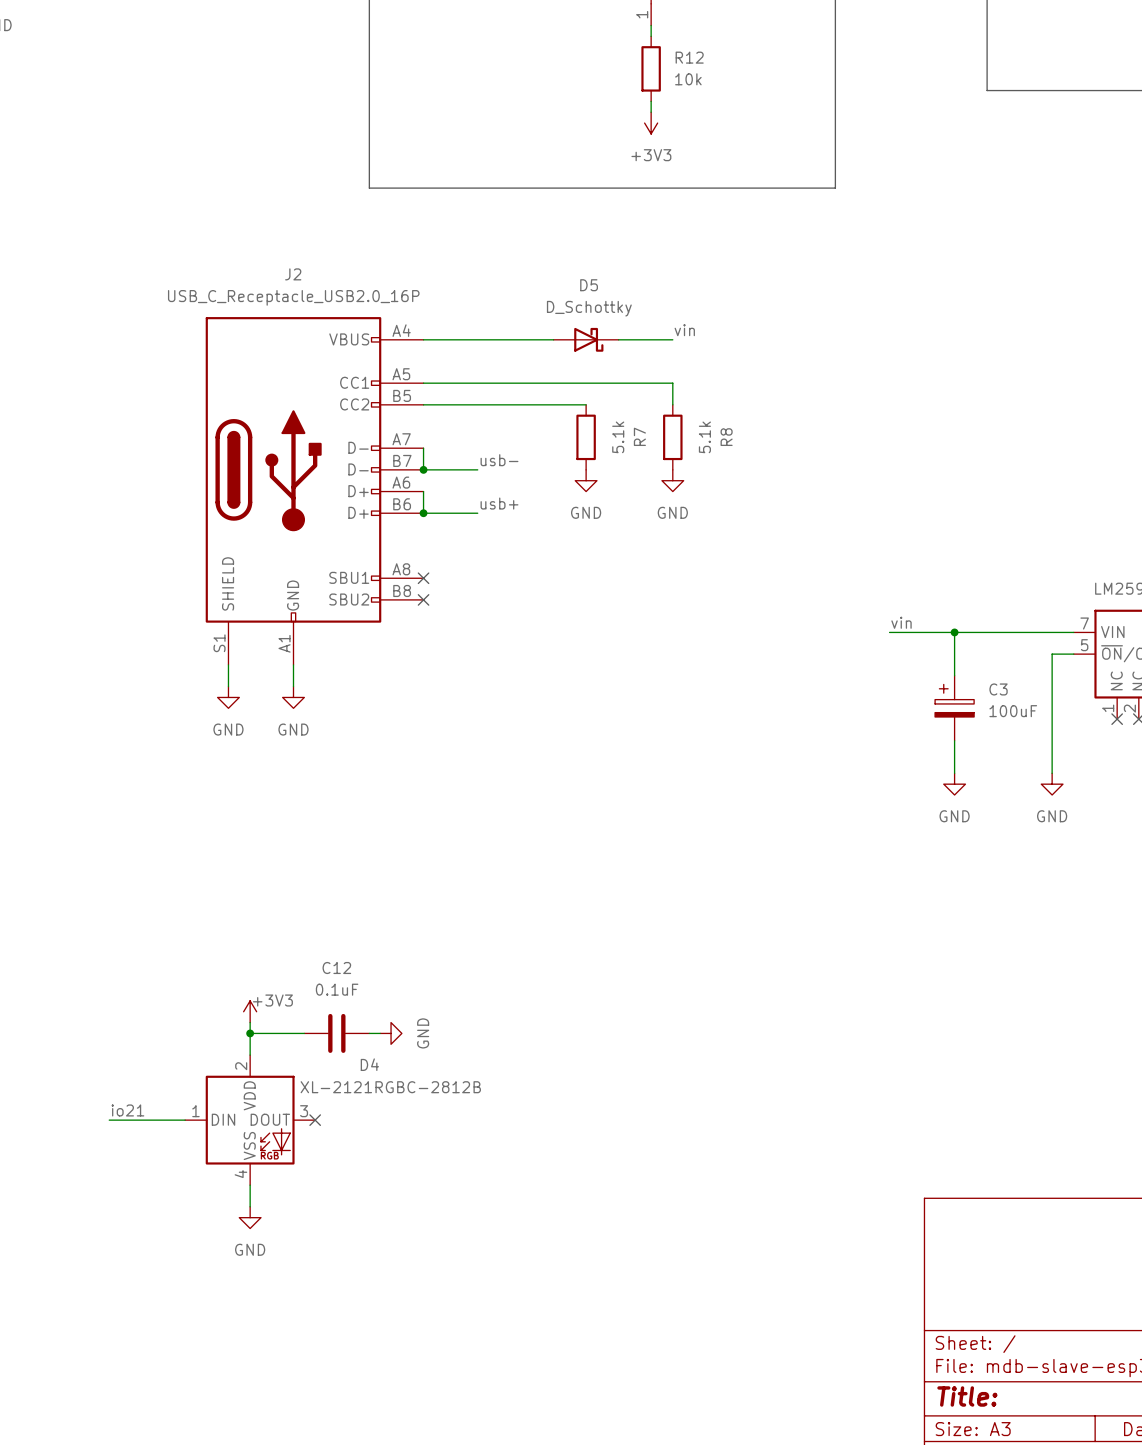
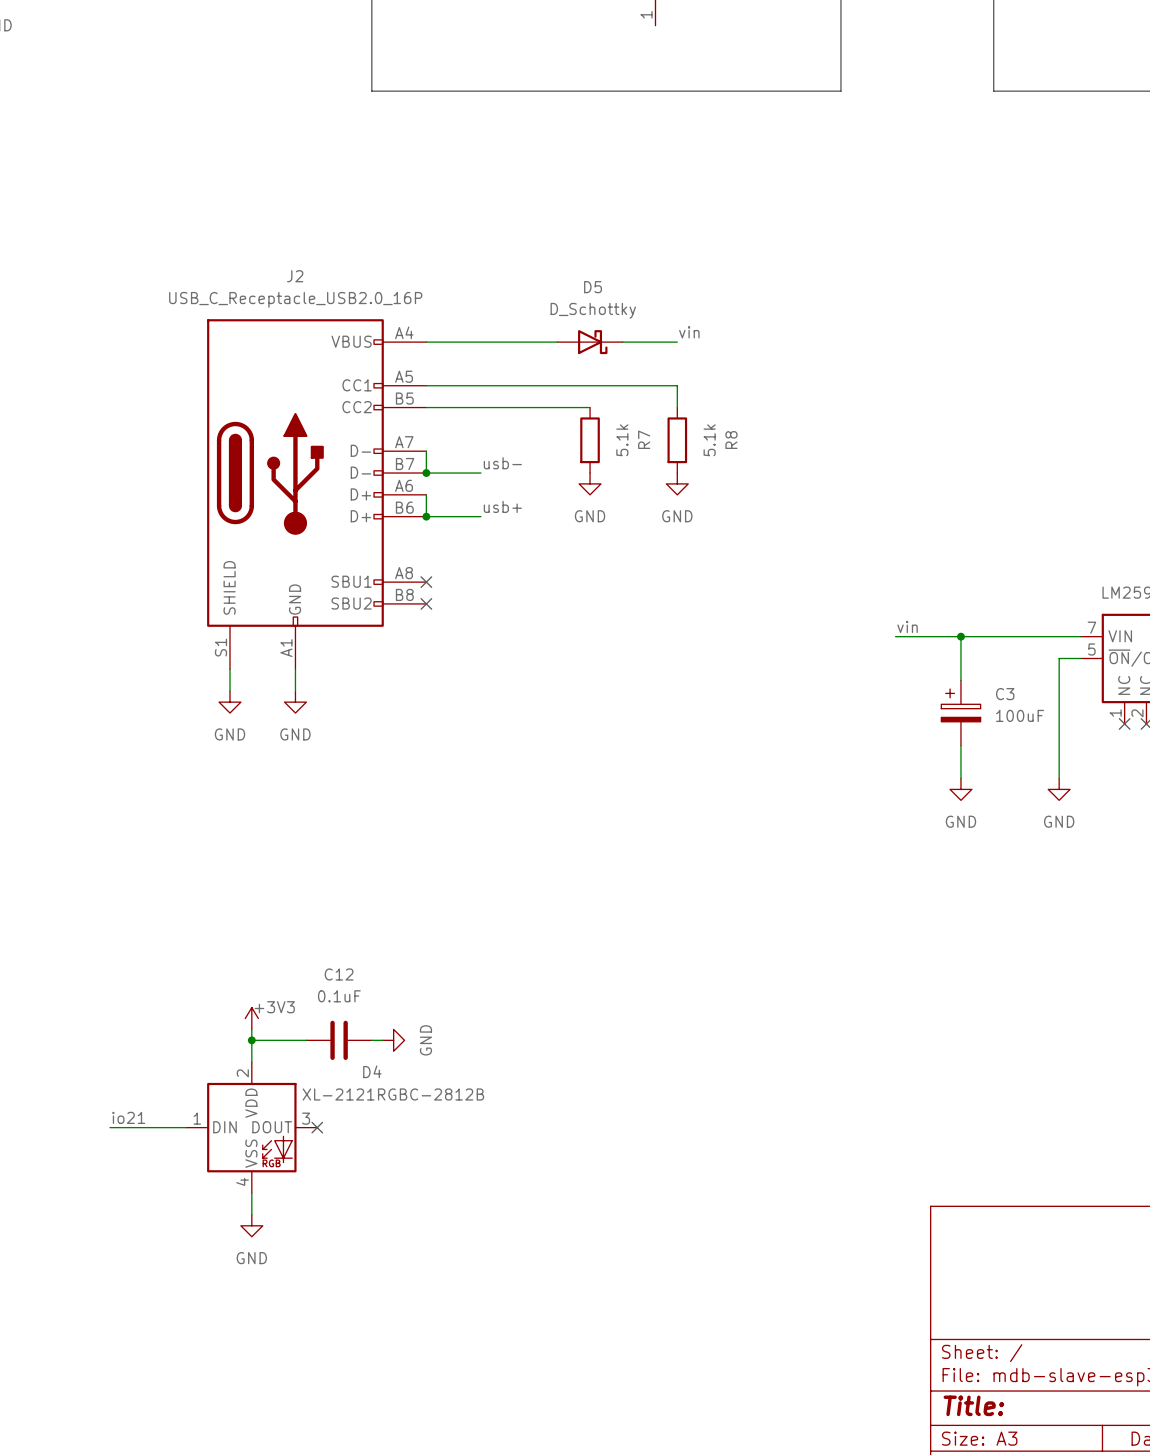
wire: (651, 25) (651, 36) -> none
R12: 10k (651, 68) -> none
line: (369, 90) (369, 188) (835, 188) (835, 90) -> (371, 91) (840, 91)
wire: (651, 101) (651, 112) -> none
power symbol: +3V3 (651, 123) -> none

